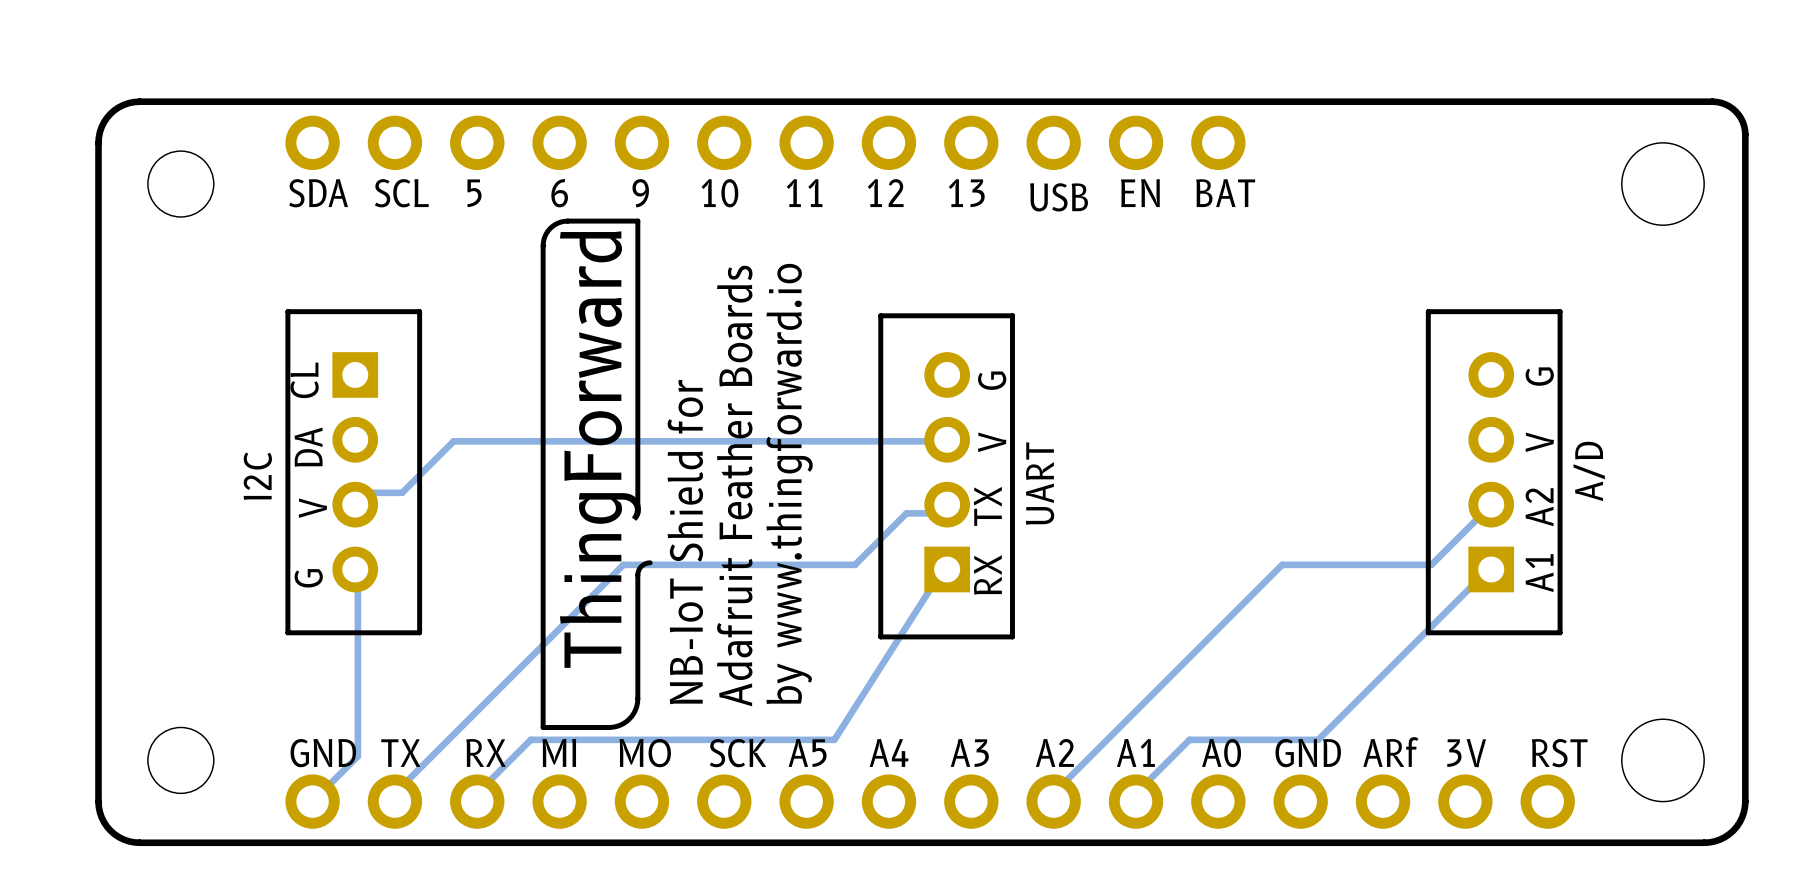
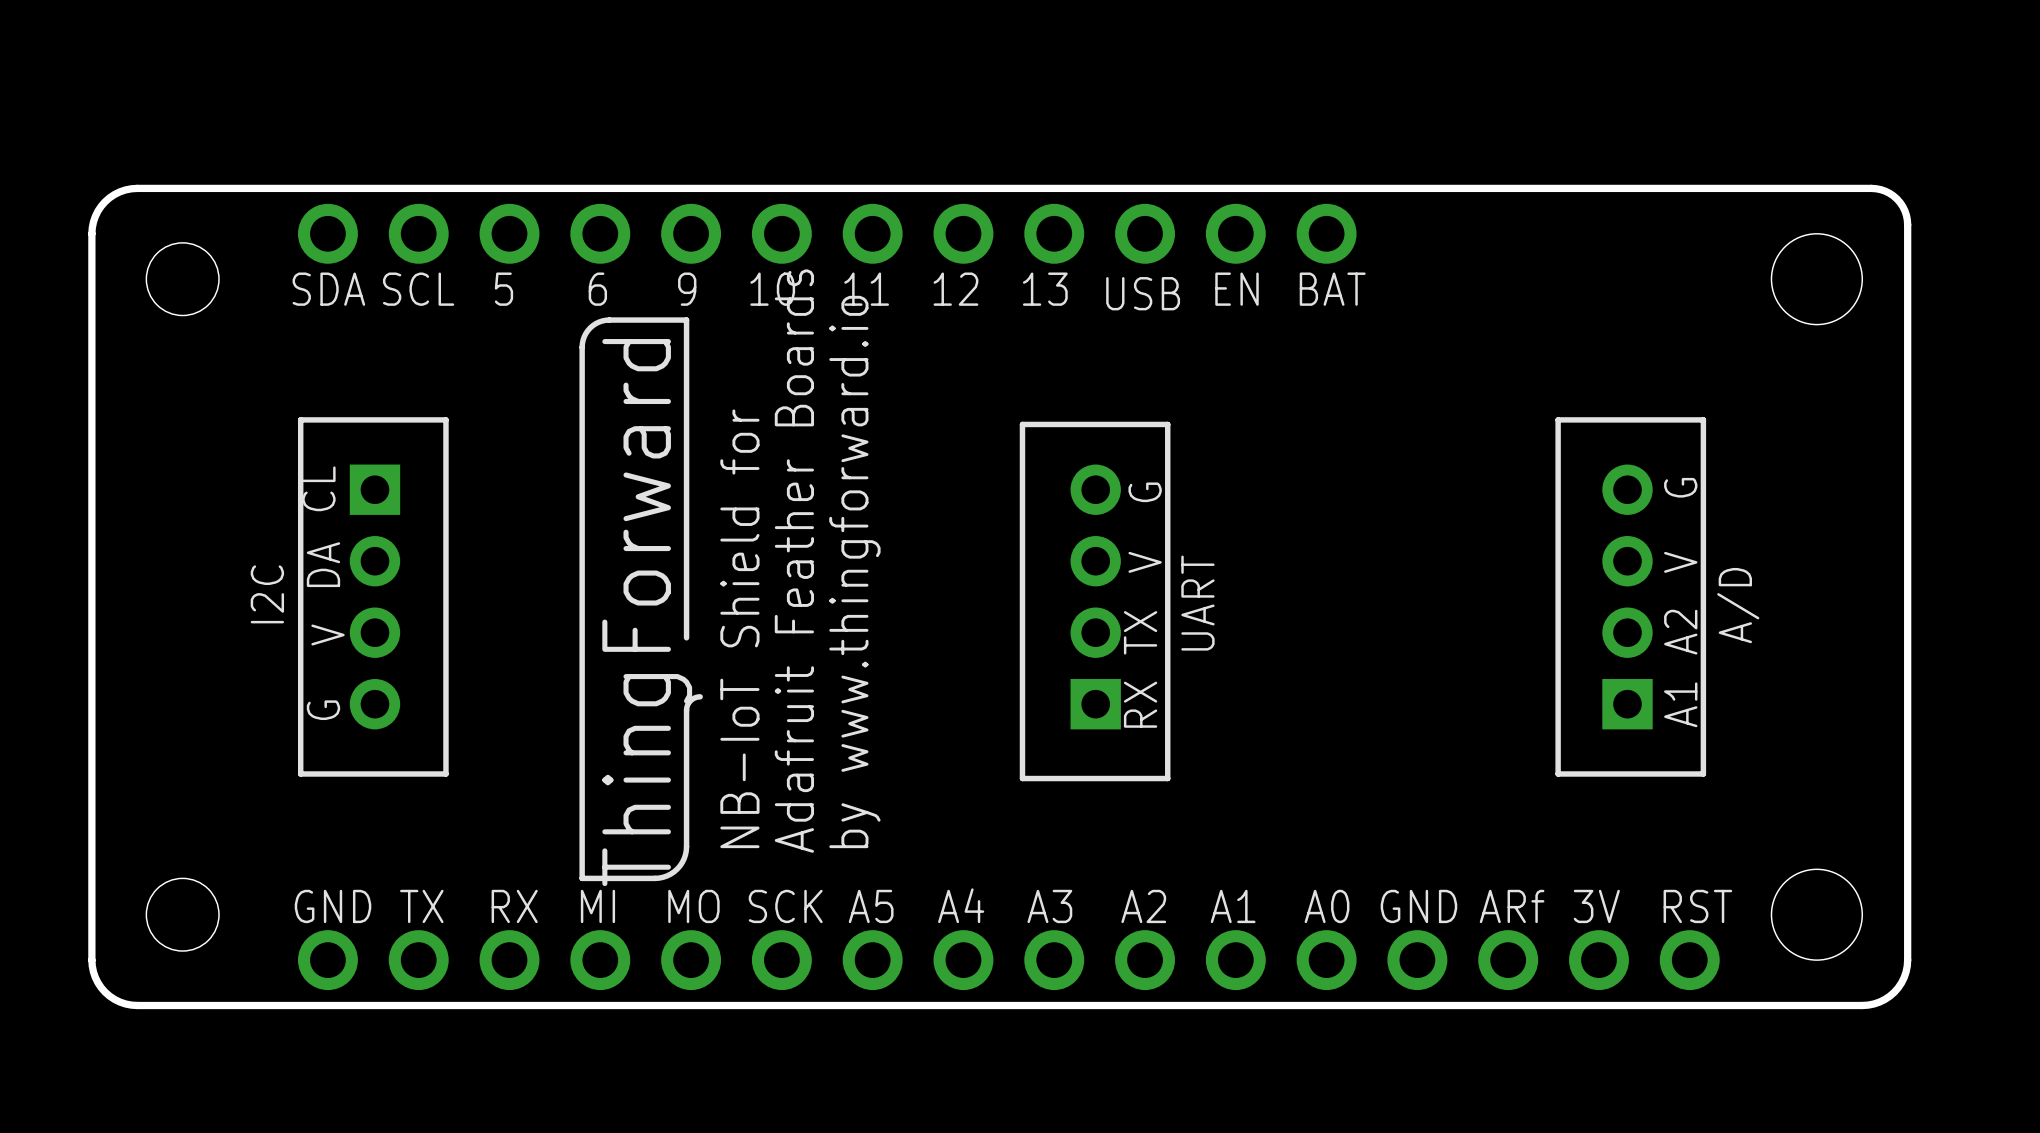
line: (942, 315) (880, 315) (880, 636) (942, 636) -> (1022, 424) (1022, 778)
line: (1012, 315) (1012, 636) -> (1099, 424) (1167, 424) (1167, 778) (1099, 778)
text position: G (992, 380) -> G (1145, 492)
track: (947, 439) (942, 441) (453, 441) (402, 492) (366, 492) (355, 504) -> none
text position: V (992, 442) -> V (1145, 562)
part position: (947, 472) -> (1095, 596)
text position: UART (1040, 483) -> UART (1197, 603)
track: (947, 504) (937, 513) (906, 513) (855, 564) (623, 564) (396, 791) (396, 801) (394, 801) -> none
track: (1491, 504) (1431, 564) (1282, 564) (1055, 791) (1055, 801) (1053, 801) -> none
text position: TX (987, 506) -> TX (1140, 632)
track: (947, 569) (942, 570) (834, 739) (530, 739) (479, 791) (479, 801) (477, 801) -> none
track: (1491, 569) (1488, 570) (1318, 739) (1189, 739) (1138, 791) (1138, 801) (1136, 801) -> none
track: (357, 571) (357, 756) (312, 801) -> none
text position: RX (987, 574) -> RX (1140, 704)

